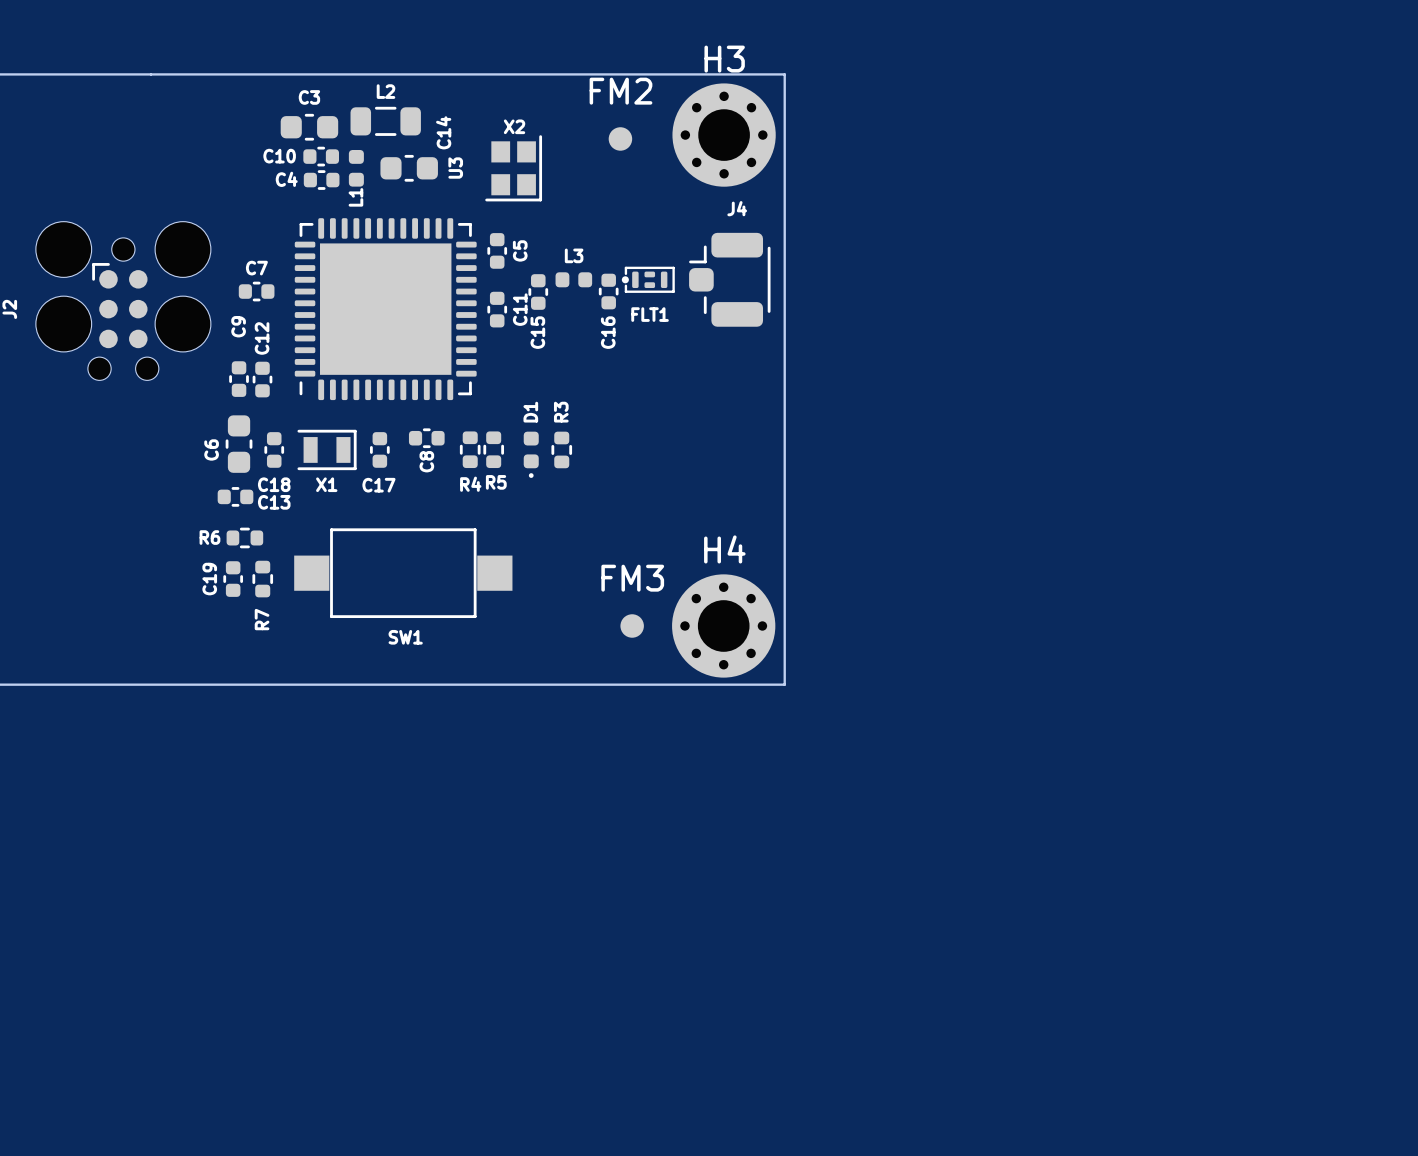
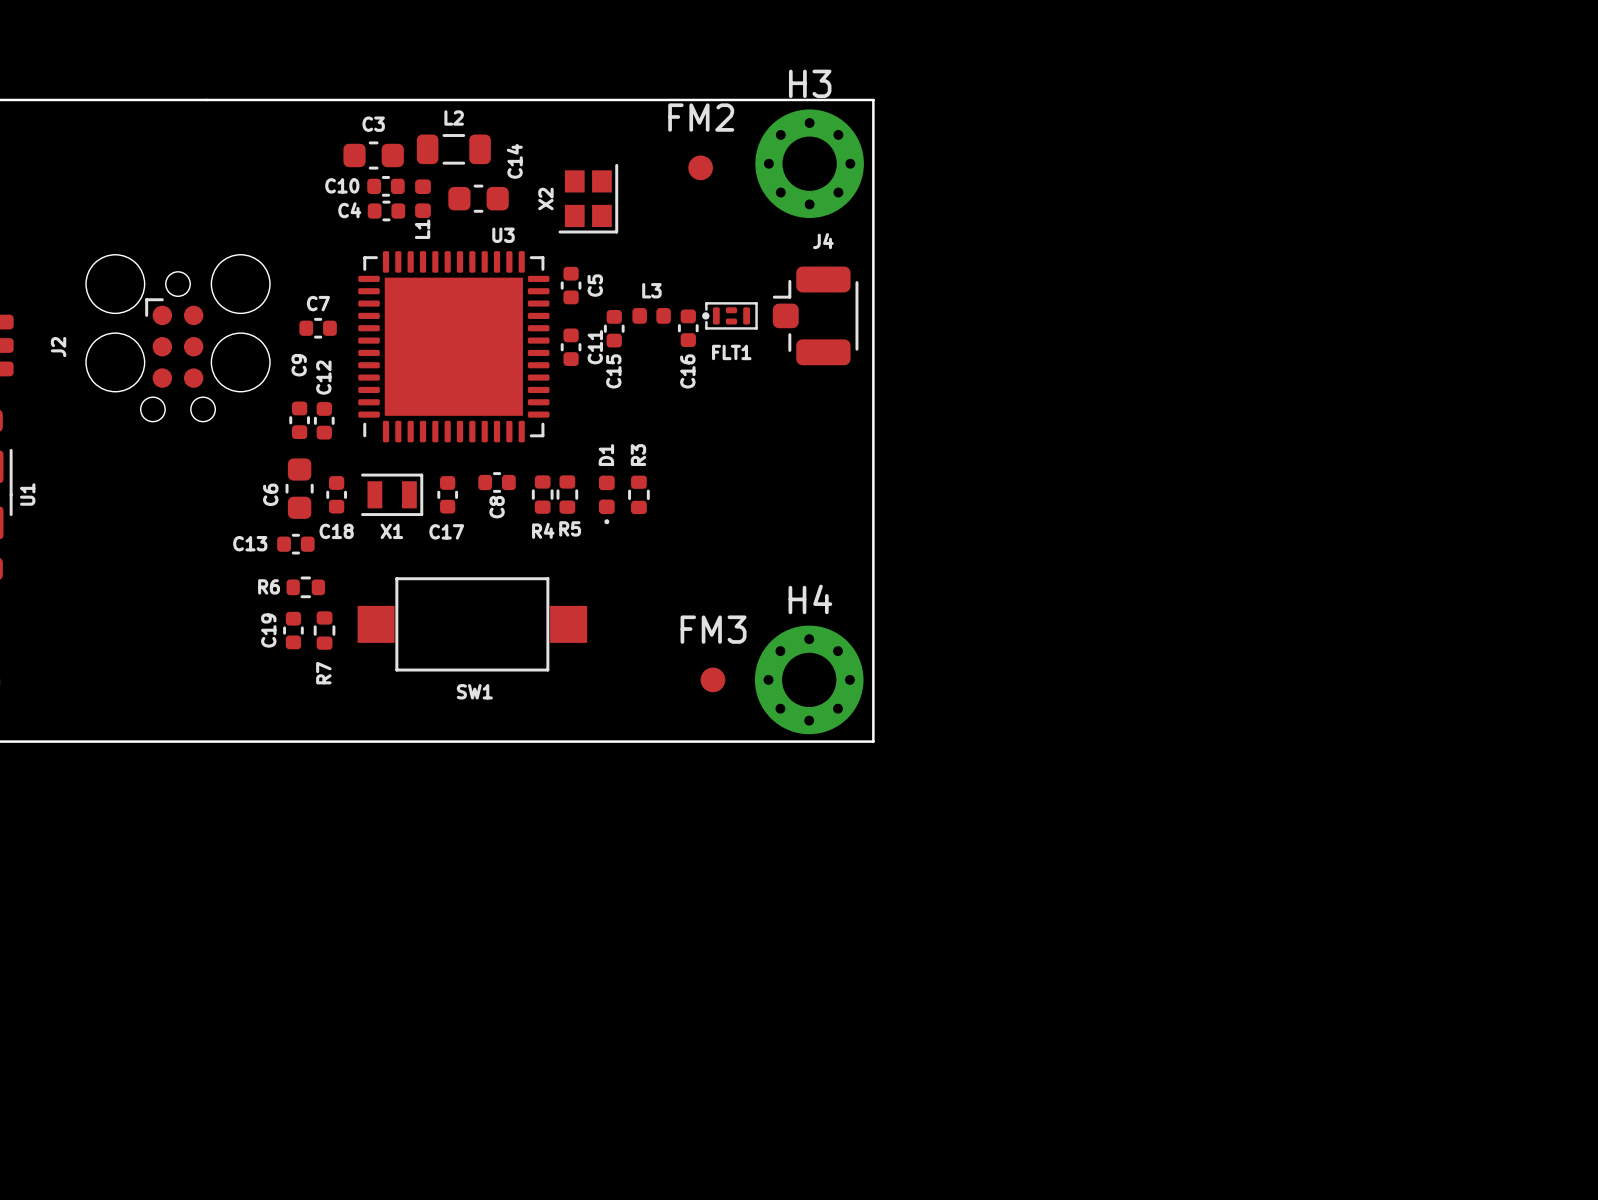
X2 name rotation: 0° (514, 126) -> 90° counterclockwise (545, 198)
X2 name position: X2 (514, 126) -> X2 (545, 198)
U3 name rotation: 0° (455, 168) -> 90° clockwise (503, 235)
U3 name position: U3 (455, 168) -> U3 (503, 235)
C13 name position: C13 (274, 502) -> C13 (250, 543)

